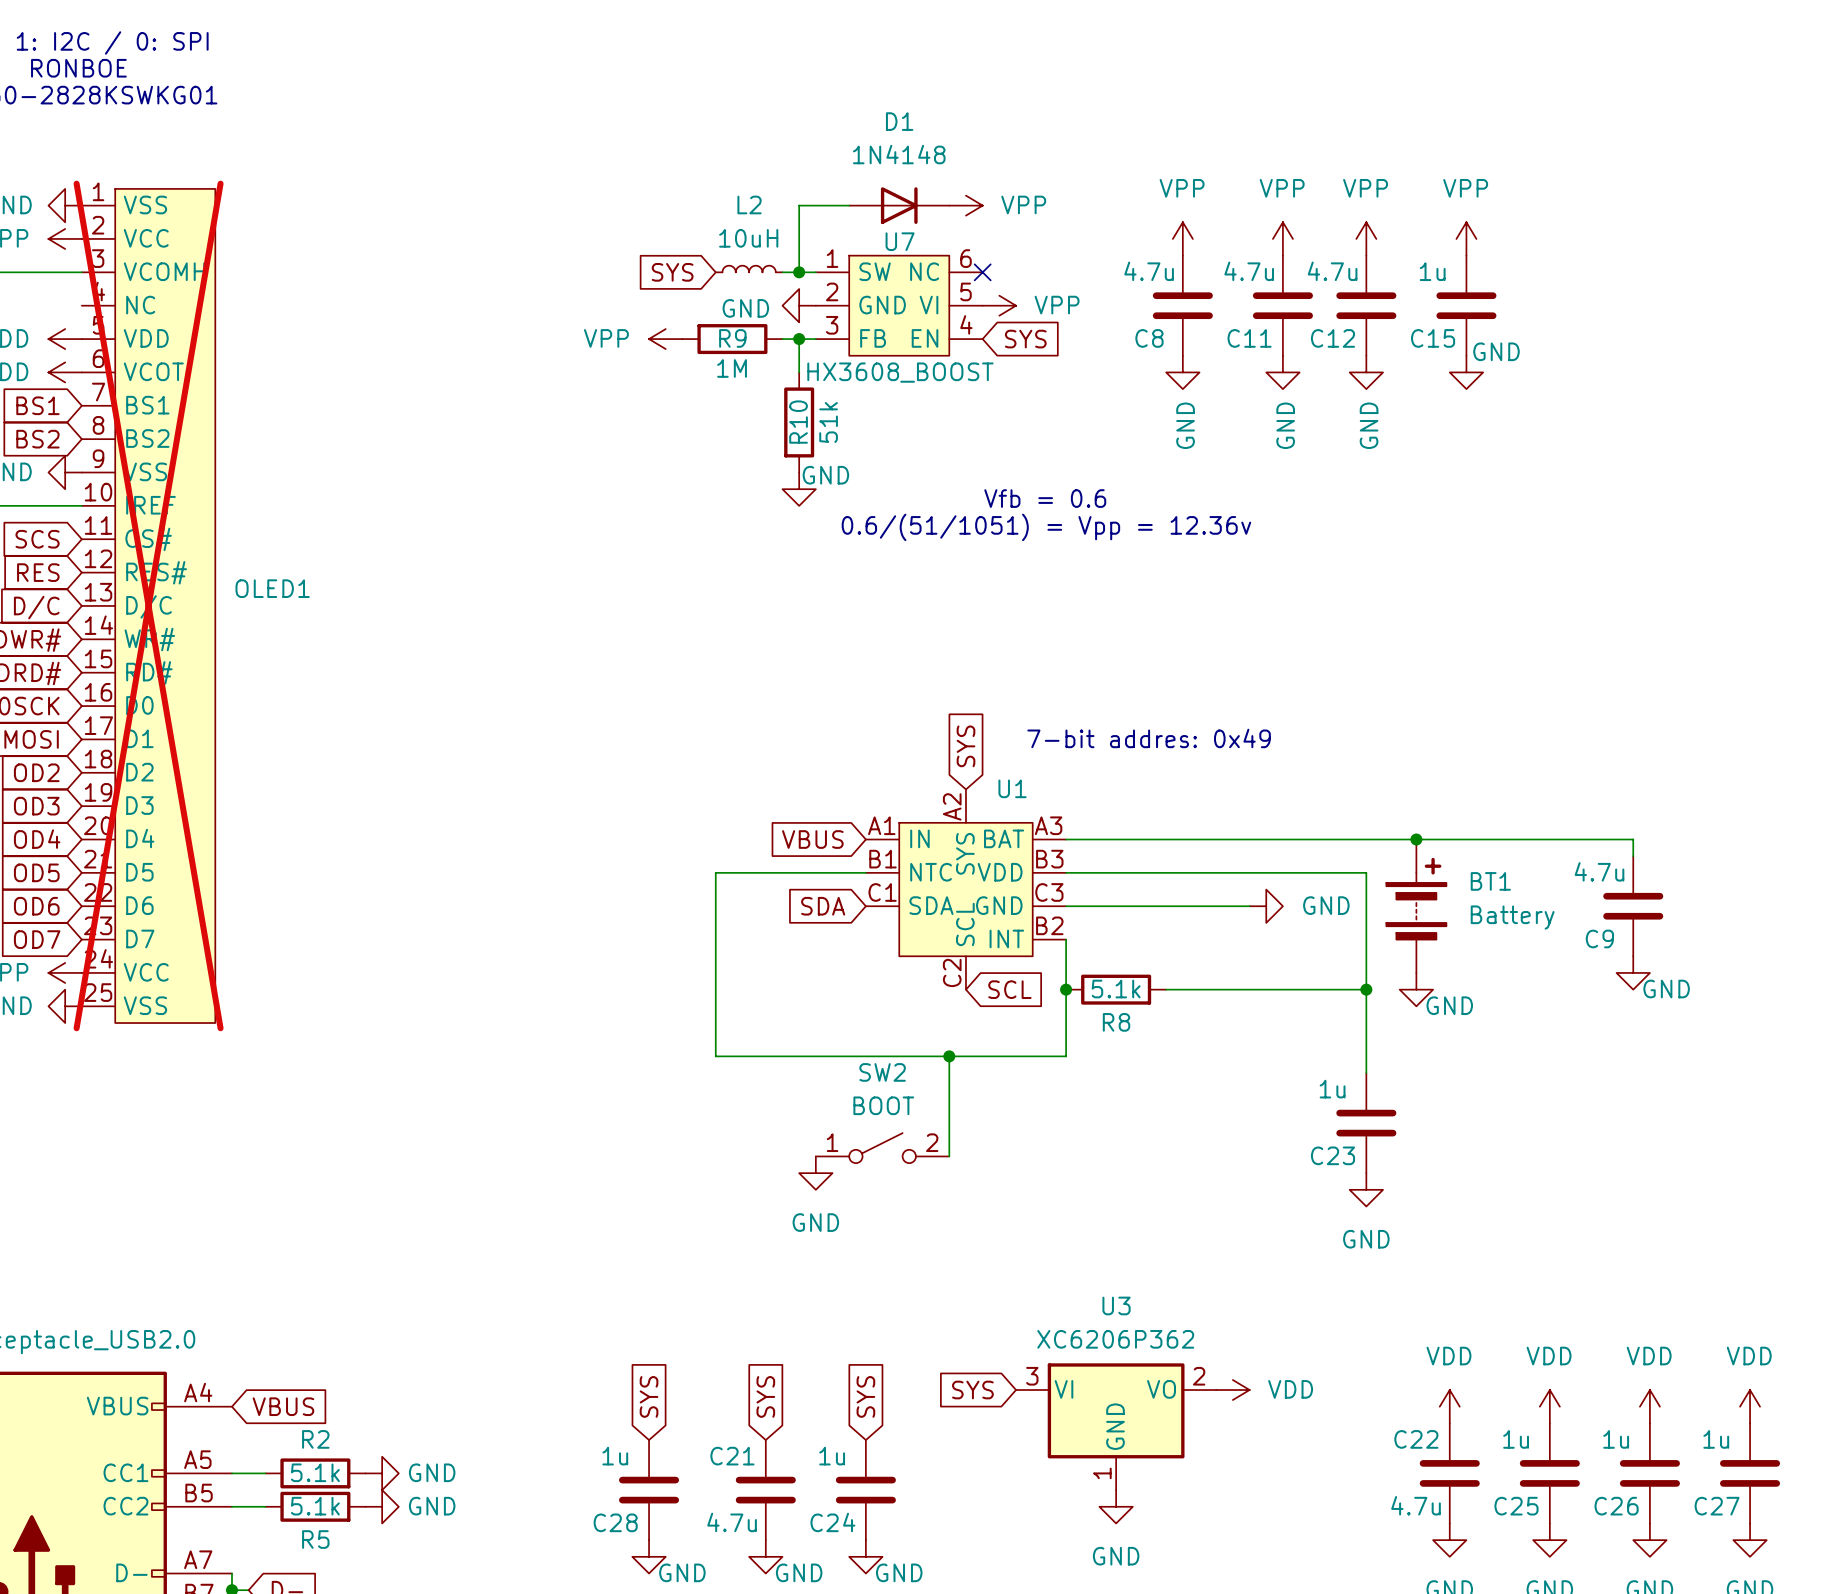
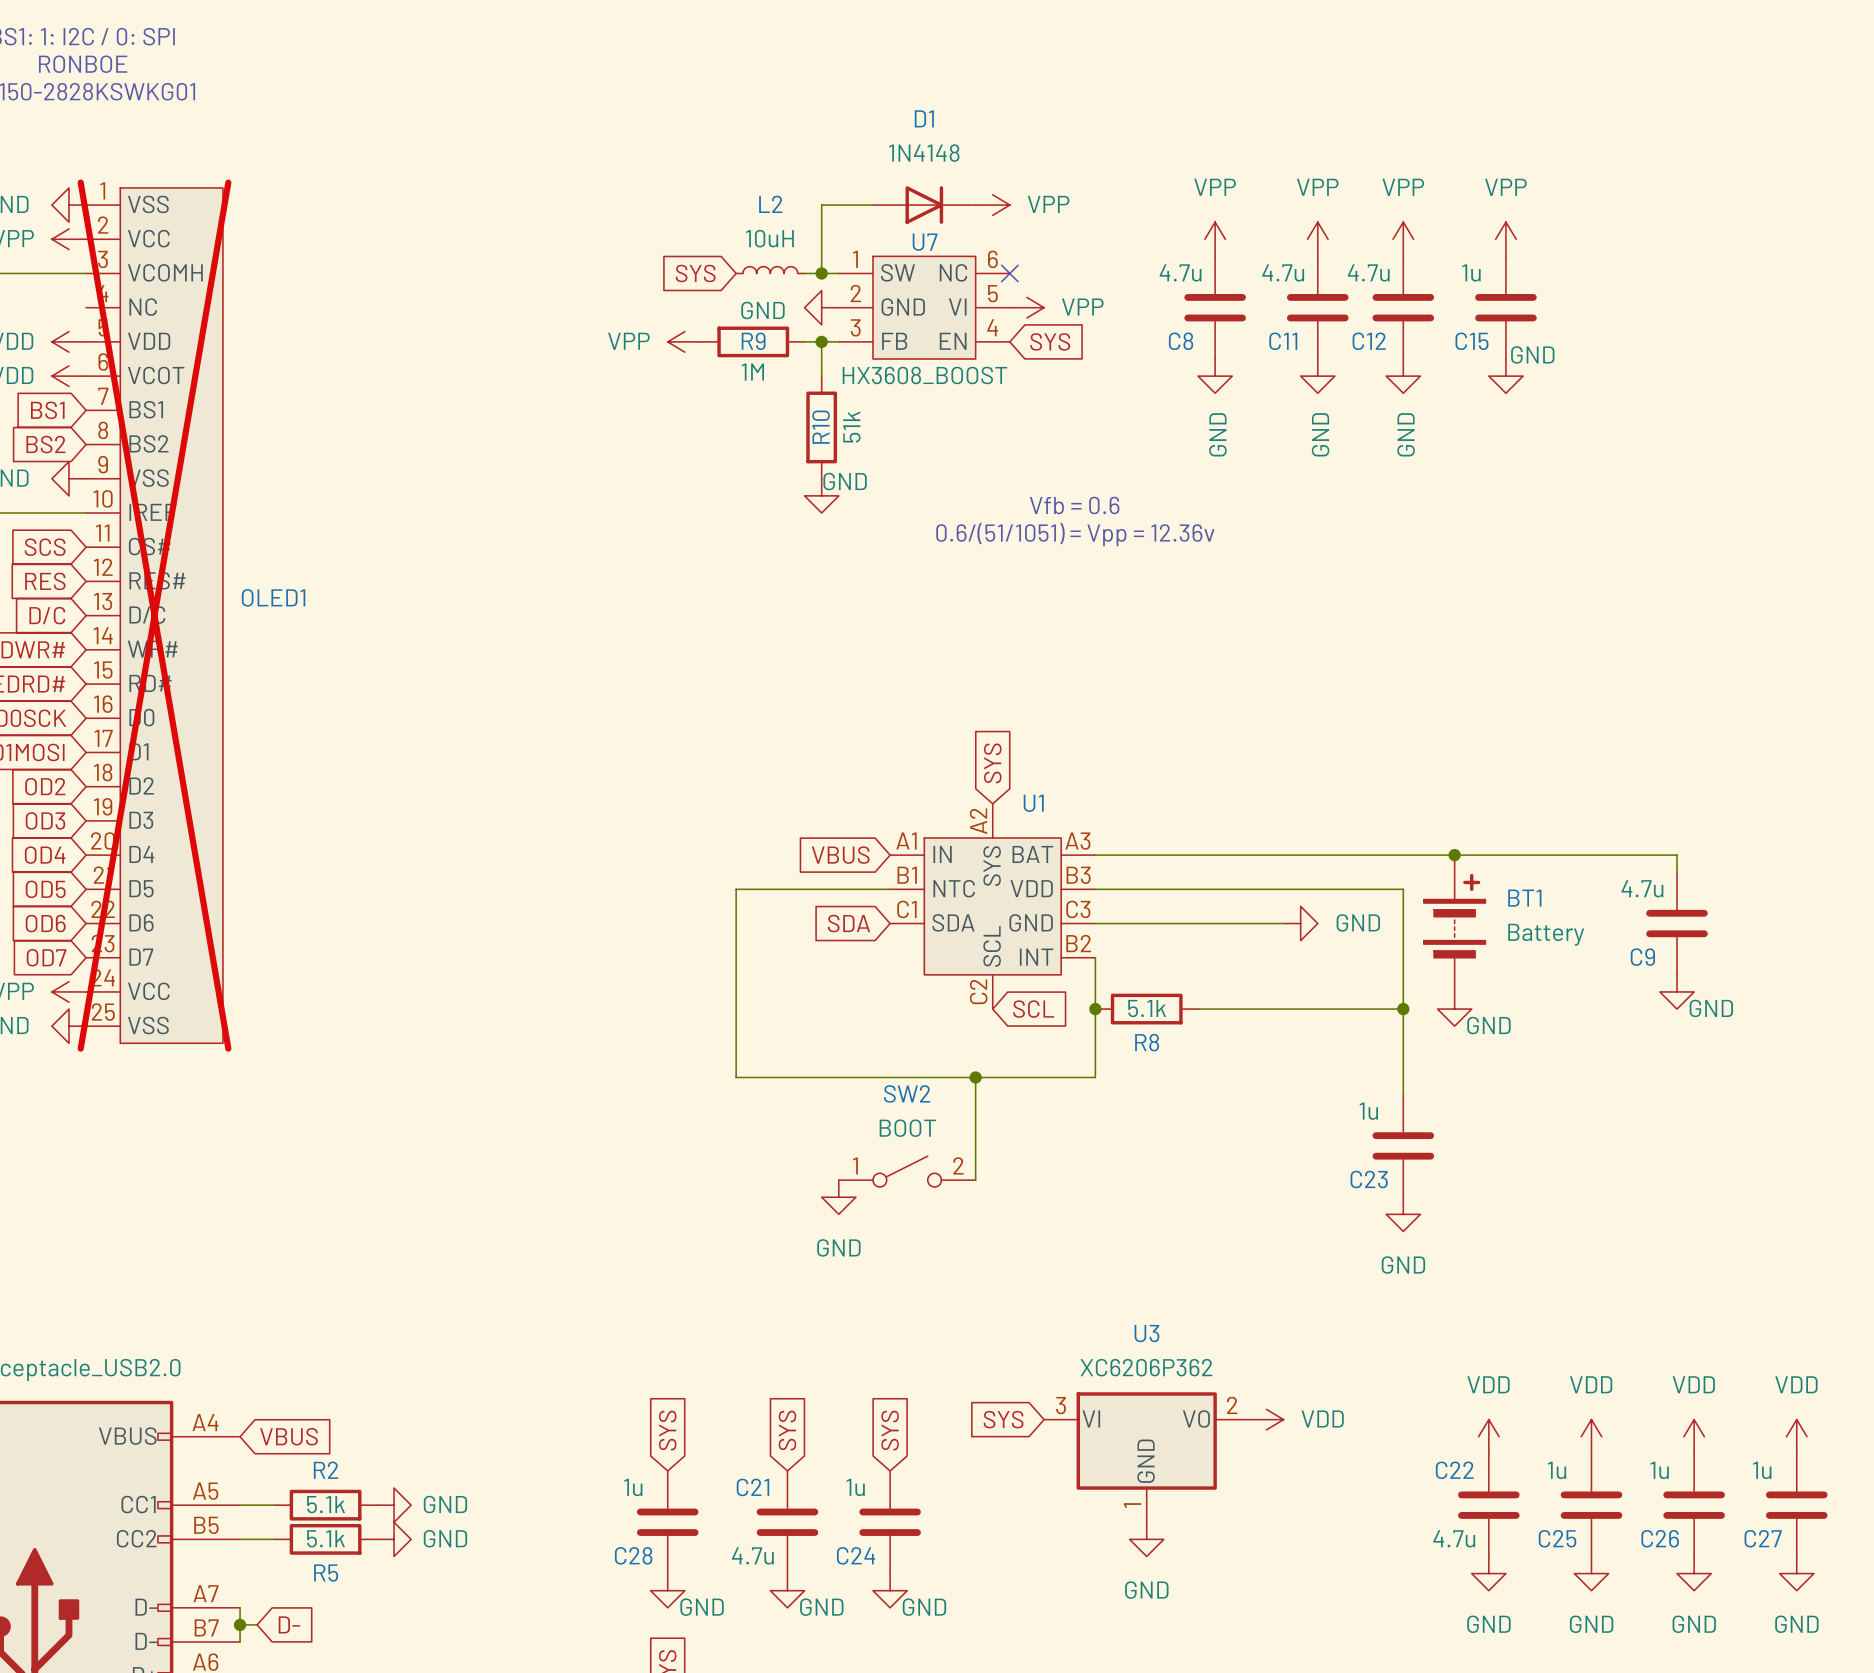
text: 7-bit addres: 0x49 (1149, 738) -> none

